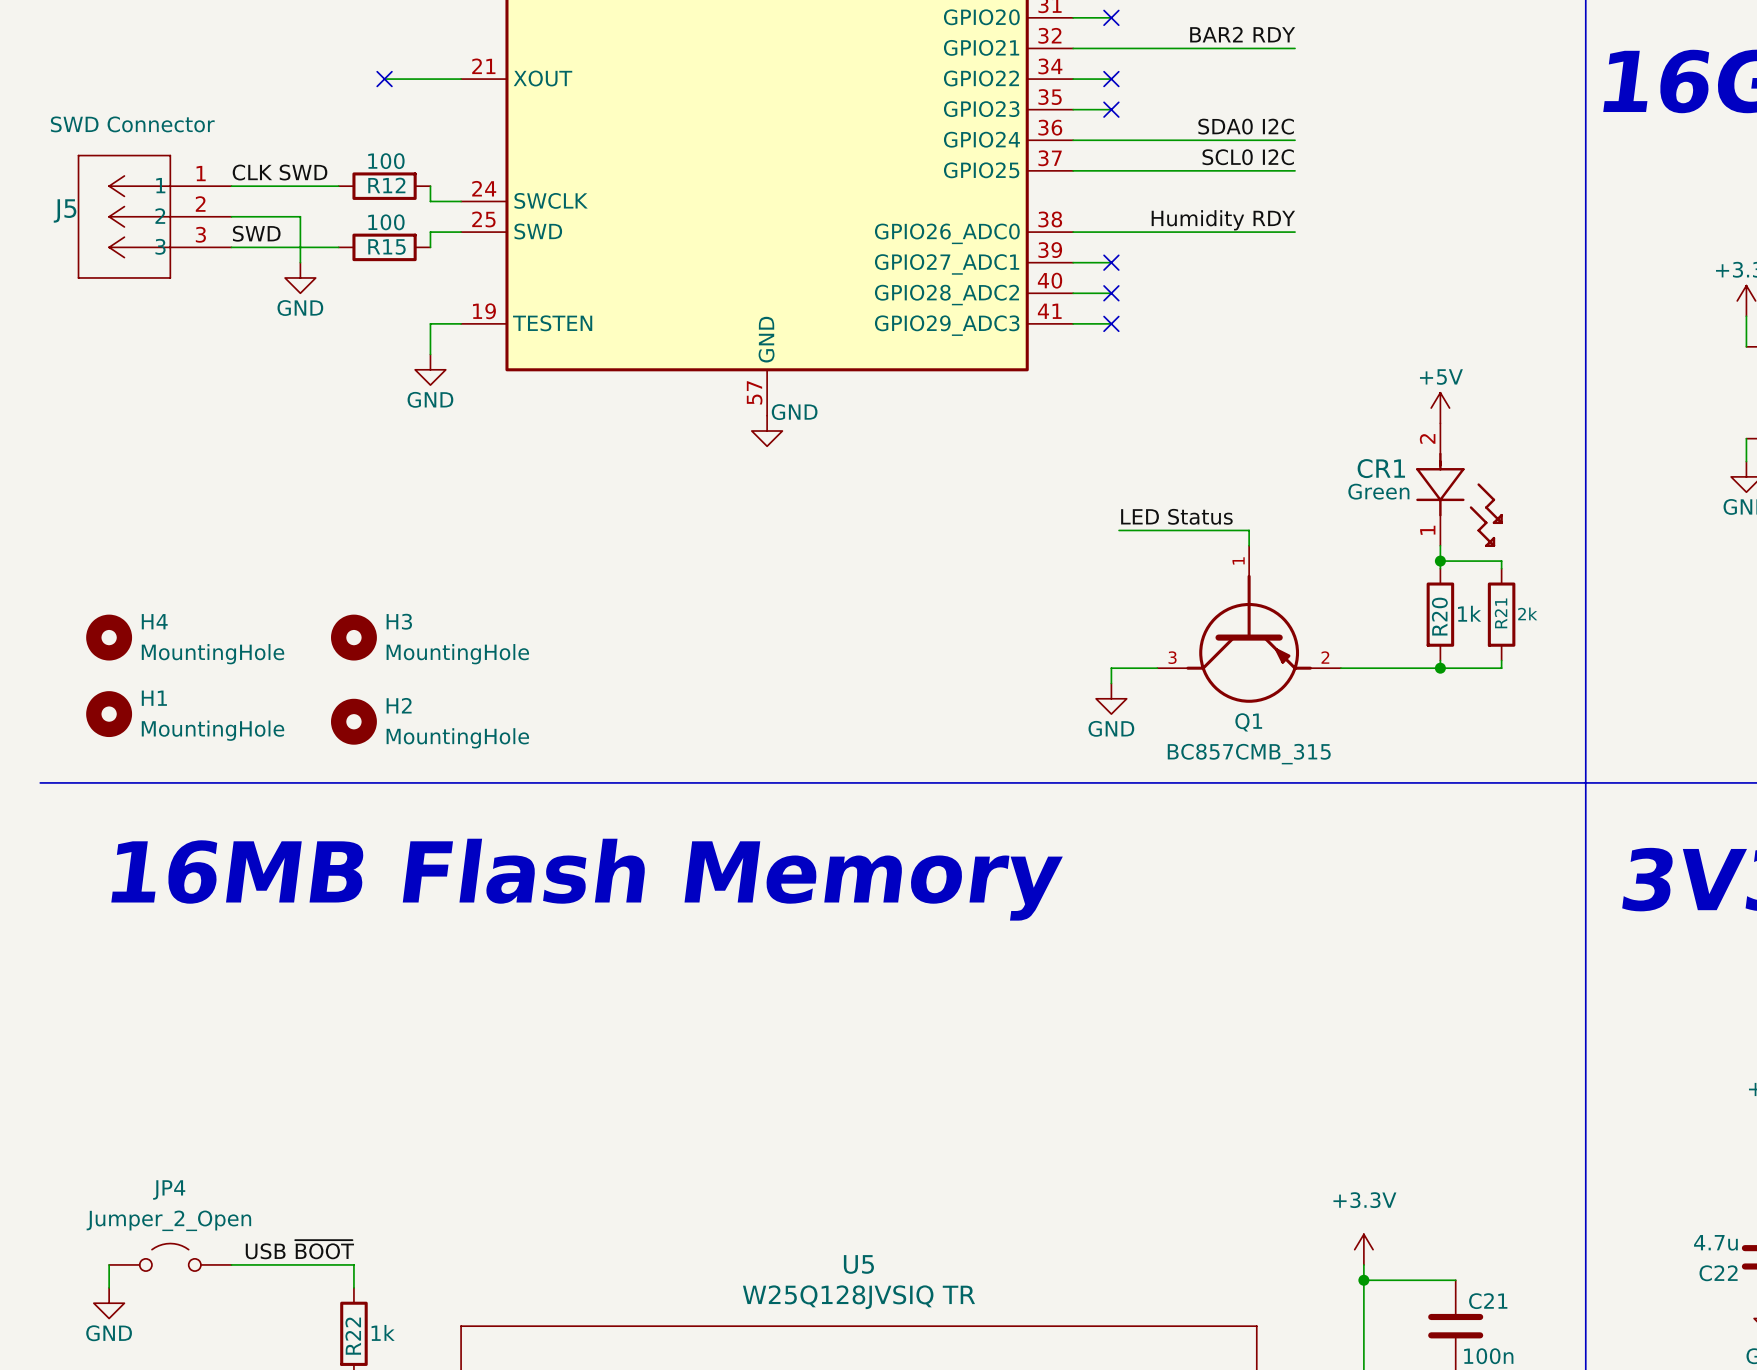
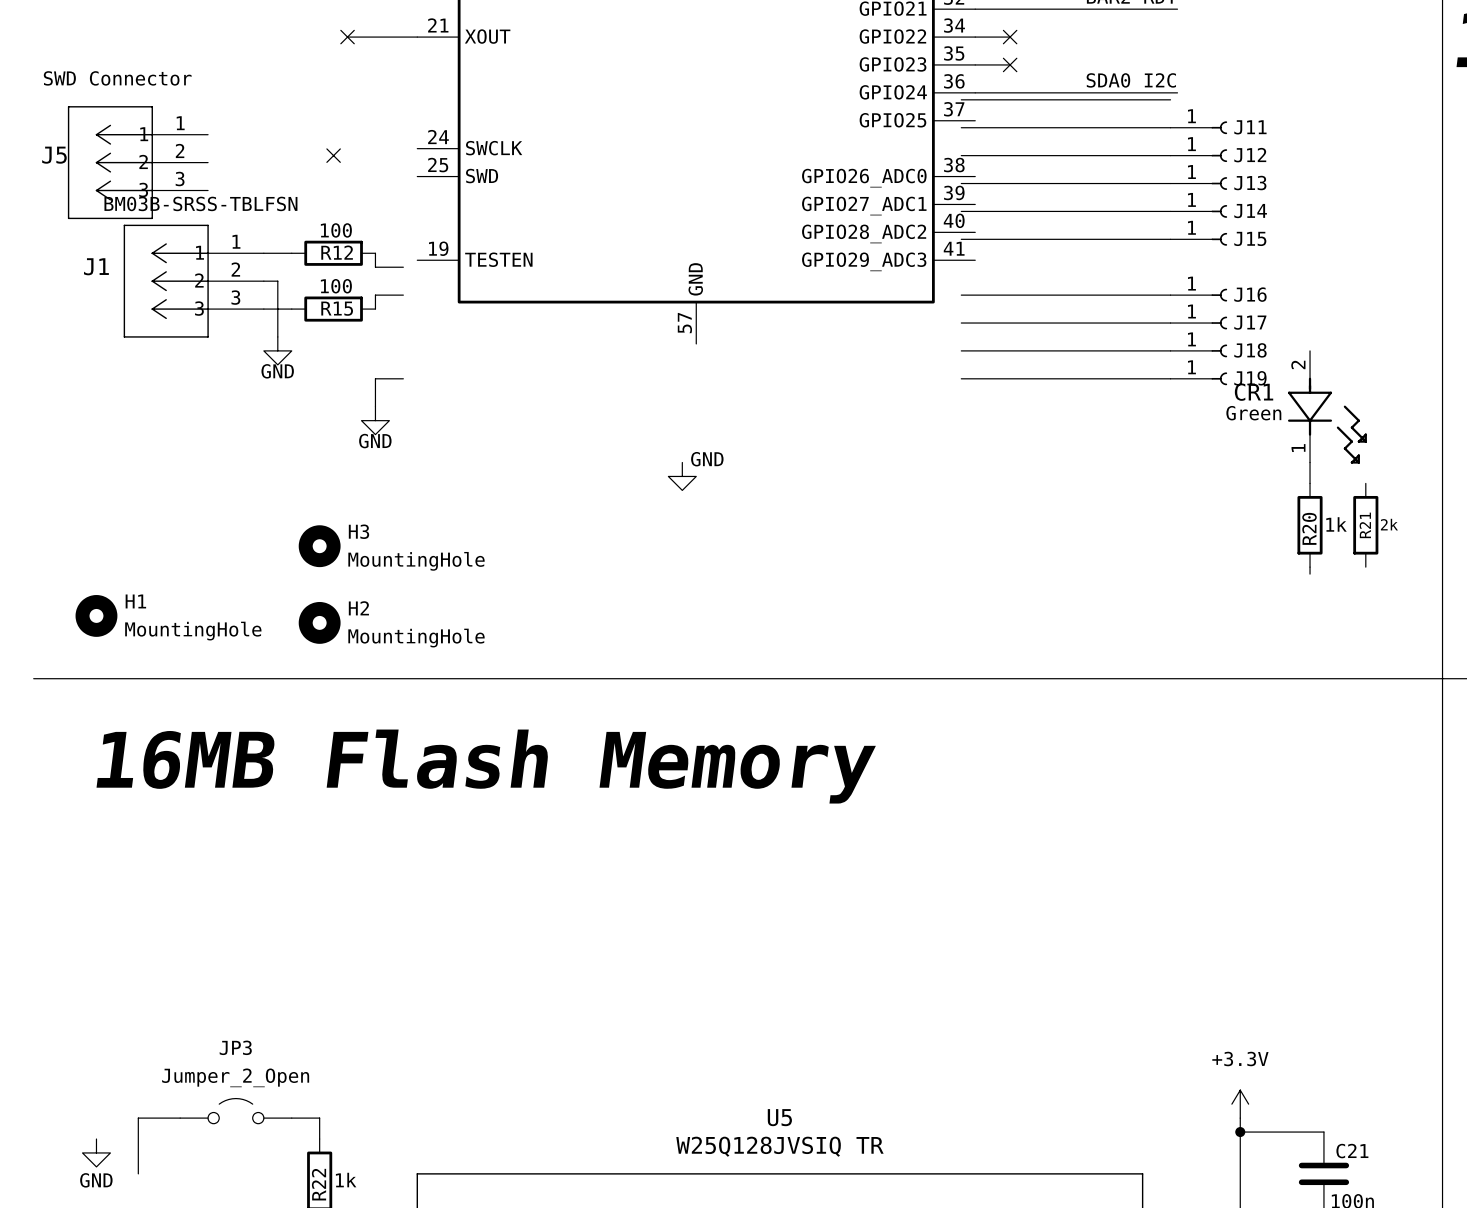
wire: none -> (961, 99) (1170, 99)
label: SCL0 I2C (1248, 157) -> none
wire: (1073, 170) (1295, 170) -> none
label: CLK SWD (280, 172) -> none
wire: none -> (961, 127) (1170, 127)
J11: none -> (1198, 127)
wire: (231, 186) (338, 186) -> none
R12 position: (384, 186) -> (333, 253)
wire: (430, 186) (430, 201) (461, 201) -> (375, 253) (375, 267) (403, 267)
no-connect mark: none -> (333, 155)
wire: none -> (961, 155) (1170, 155)
J12: none -> (1198, 155)
wire: (231, 216) (300, 216) (300, 262) -> none
label: Humidity RDY (1223, 220) -> none
wire: (461, 232) (430, 232) (430, 247) -> (403, 295) (375, 295) (375, 309)
wire: (1073, 232) (1295, 232) -> none
label: SWD (256, 233) -> none
wire: none -> (961, 183) (1170, 183)
J13: none -> (1198, 183)
wire: (231, 247) (338, 247) -> none
R15 position: (384, 247) -> (333, 309)
wire: (1073, 262) (1111, 262) -> none
no-connect mark: (1111, 262) -> none
wire: none -> (961, 211) (1170, 211)
J14: none -> (1198, 211)
power symbol: GND (300, 277) -> none
wire: (1073, 293) (1111, 293) -> none
no-connect mark: (1111, 293) -> none
wire: none -> (961, 239) (1170, 239)
J15: none -> (1198, 239)
wire: none -> (263, 253) (291, 253)
wire: (461, 323) (430, 323) (430, 354) -> (403, 378) (375, 378) (375, 406)
wire: (1073, 323) (1111, 323) -> none
no-connect mark: (1111, 323) -> none
J1: none -> BM03B-SRSS-TBLFSN (193, 281)
wire: none -> (263, 281) (277, 281) (277, 336)
wire: none -> (961, 295) (1170, 295)
J16: none -> (1198, 295)
power symbol: GND (430, 369) -> none
wire: none -> (263, 309) (291, 309)
wire: none -> (961, 323) (1170, 323)
J17: none -> (1198, 323)
power symbol: +5V (1440, 408) -> none
power symbol: none -> GND (277, 350)
wire: none -> (961, 350) (1170, 350)
J18: none -> (1198, 350)
power symbol position: GND (767, 431) -> GND (682, 476)
wire: none -> (961, 378) (1170, 378)
J19: none -> (1198, 378)
power symbol: none -> GND (375, 420)
label: LED Status (1176, 516) -> none
wire: (1119, 530) (1249, 530) (1249, 545) -> none
wire: (1440, 561) (1501, 561) (1501, 568) -> none
junction: (1440, 561) -> none
Q1: BC857CMB_315 (1249, 624) -> none
H4: MountingHole (109, 637) -> none
wire: (1501, 660) (1501, 668) (1340, 668) -> none
wire: (1157, 668) (1111, 668) (1111, 683) -> none
junction: (1440, 668) -> none
power symbol: GND (1111, 698) -> none
label: USB ~{BOOT} (299, 1249) -> none
JP4: Jumper_2_Open (170, 1257) -> none
JP3: none -> Jumper_2_Open (235, 1111)
wire: (109, 1264) (109, 1287) -> none
wire: none -> (180, 1118) (138, 1118) (138, 1173)
wire: (231, 1264) (323, 1264) -> none

